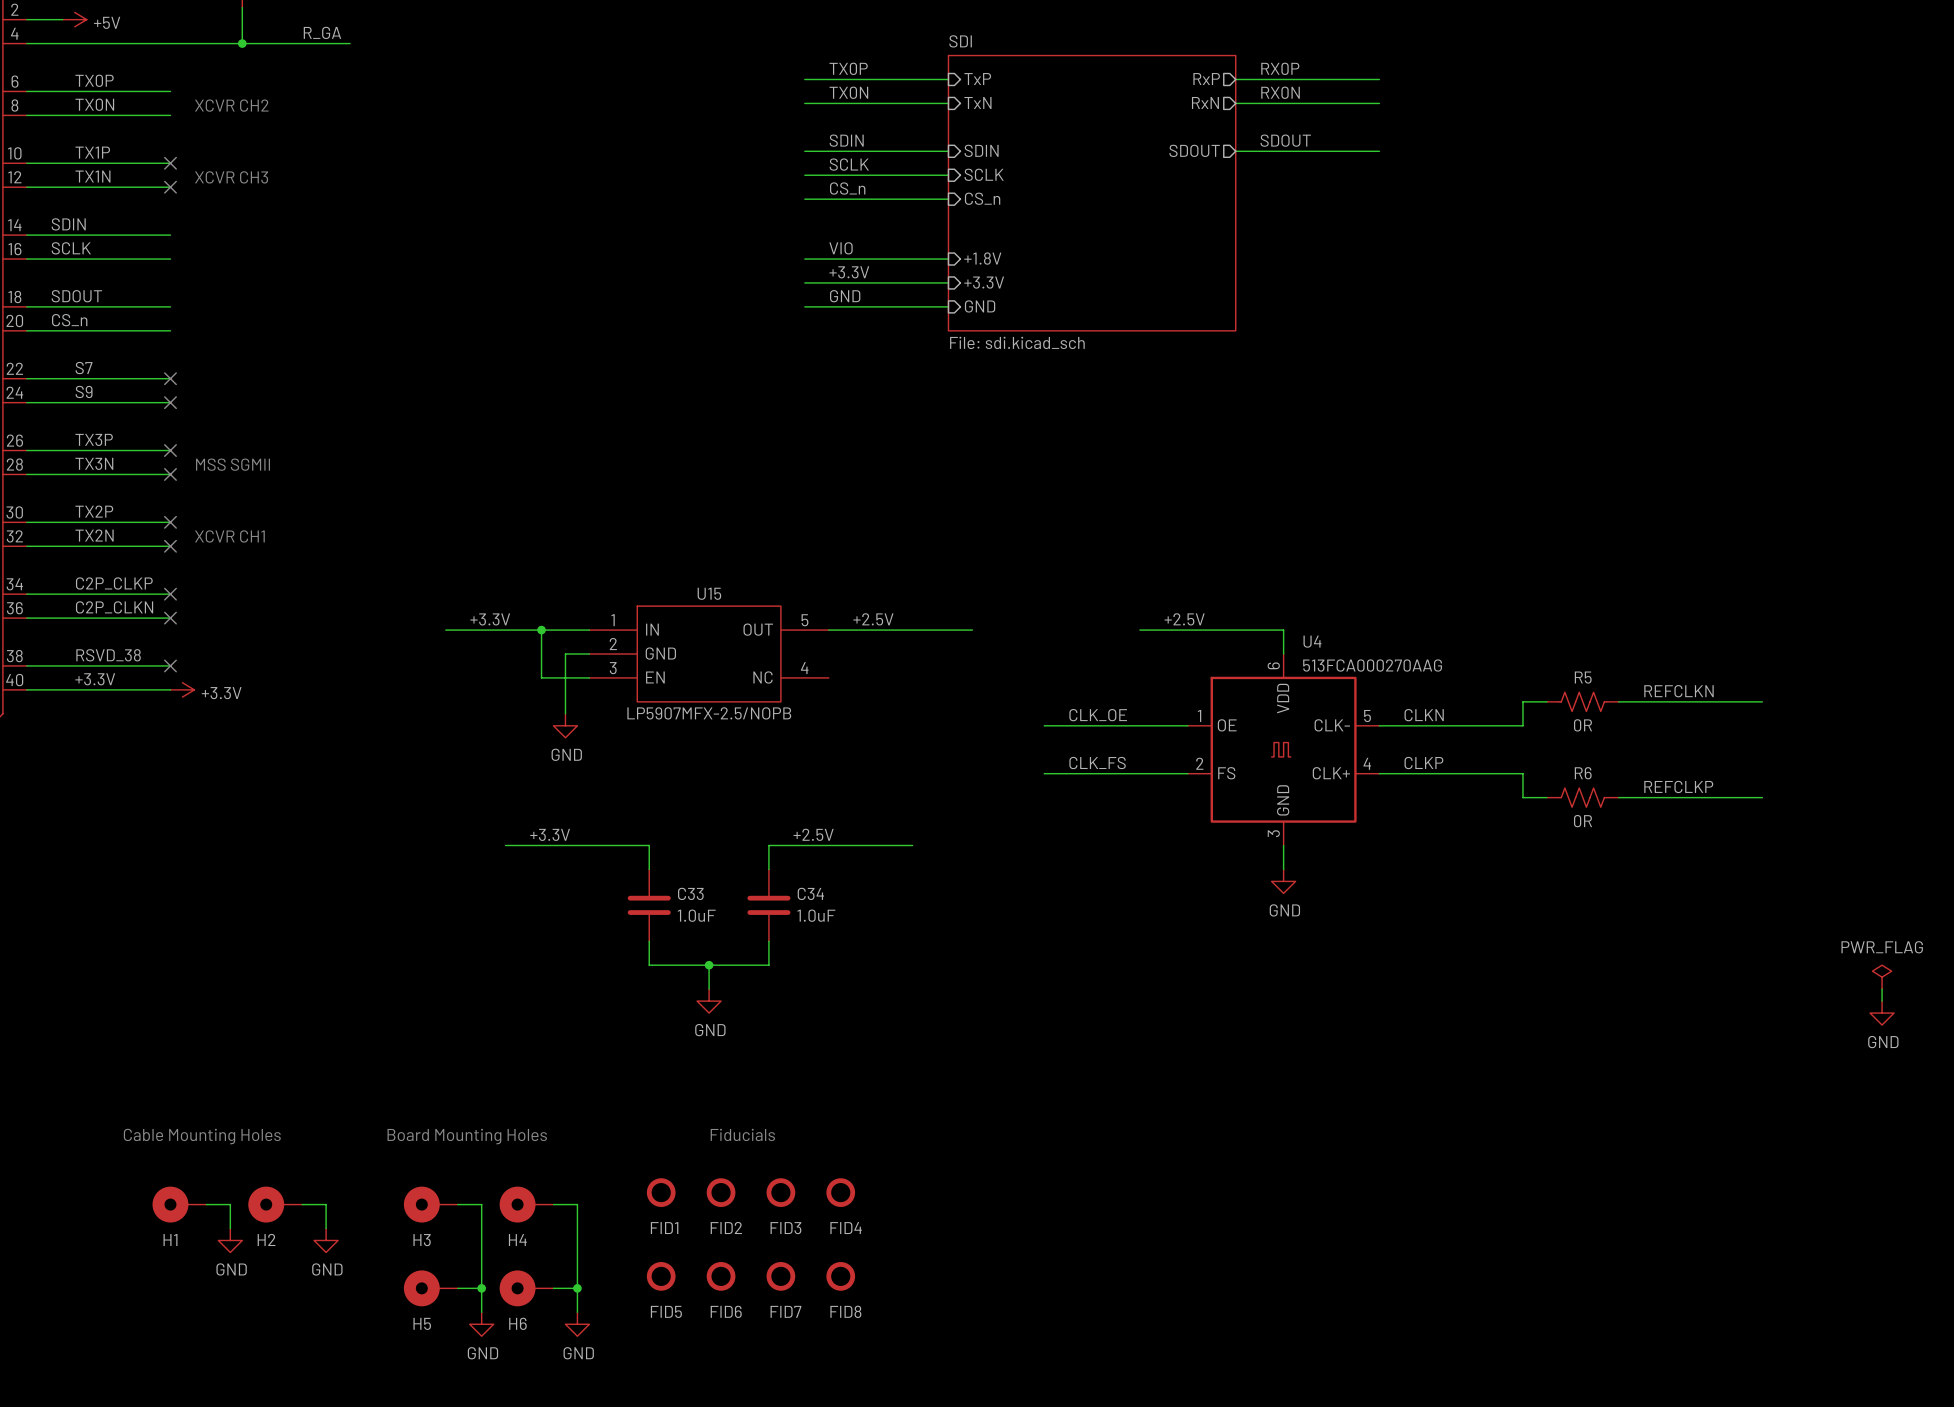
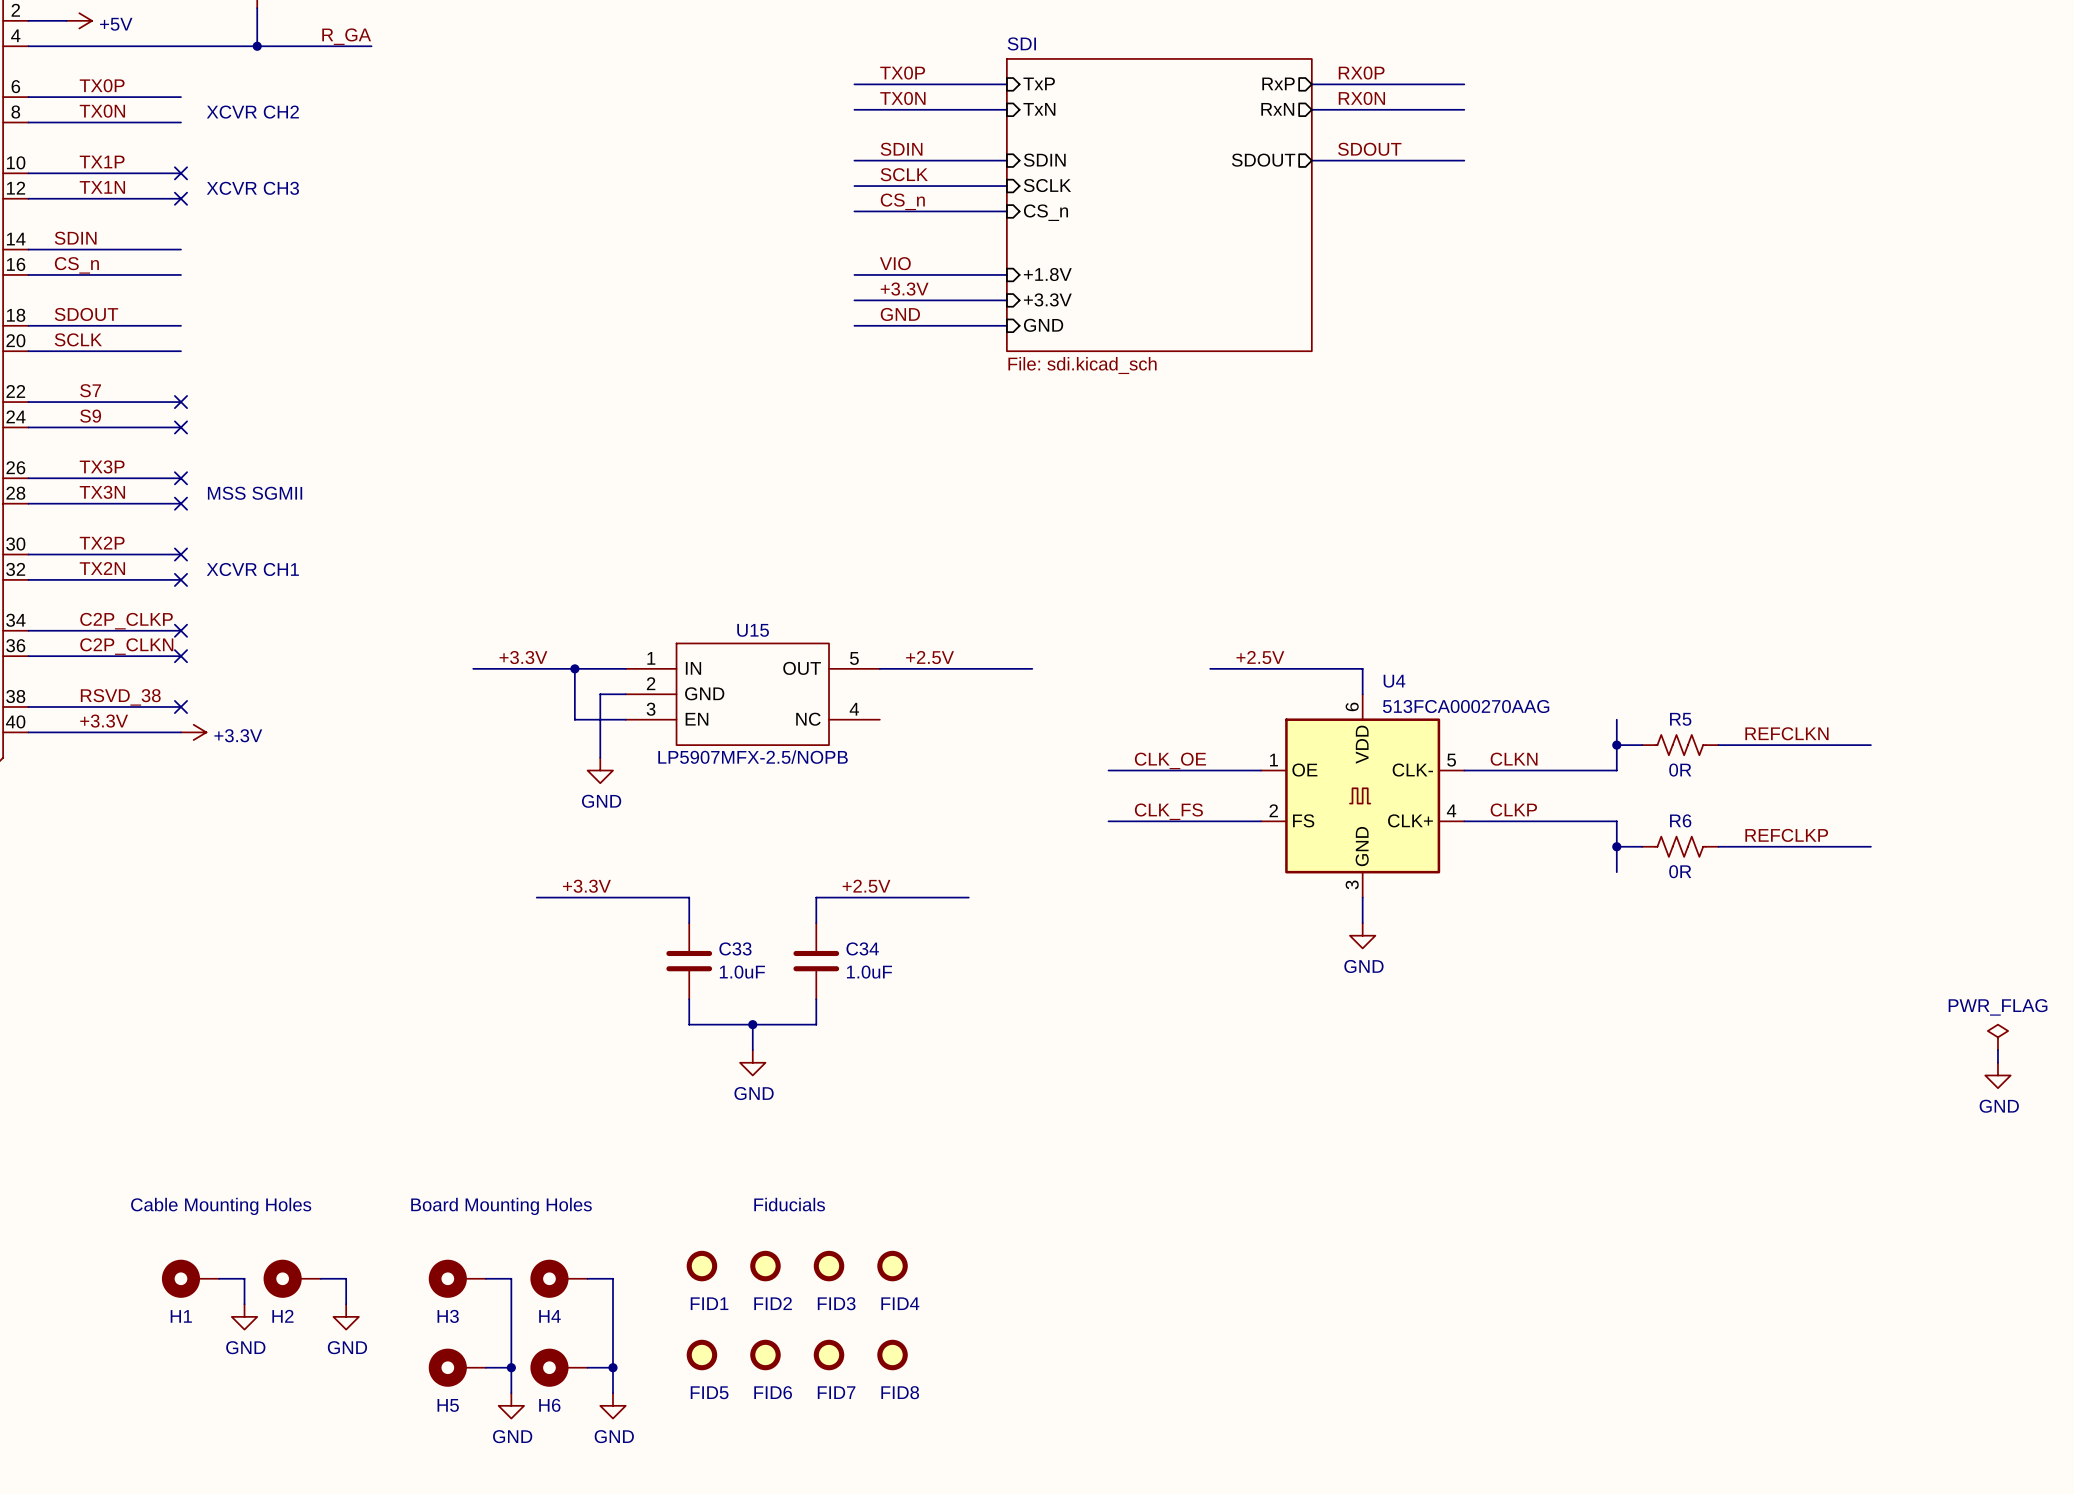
label: SCLK (71, 248) -> CS_n (76, 265)
label: CS_n (69, 320) -> SCLK (78, 339)
wire: none -> (1616, 719) (1616, 745)
junction: none -> (1616, 745)
wire: none -> (1616, 846) (1616, 872)
junction: none -> (1616, 846)

